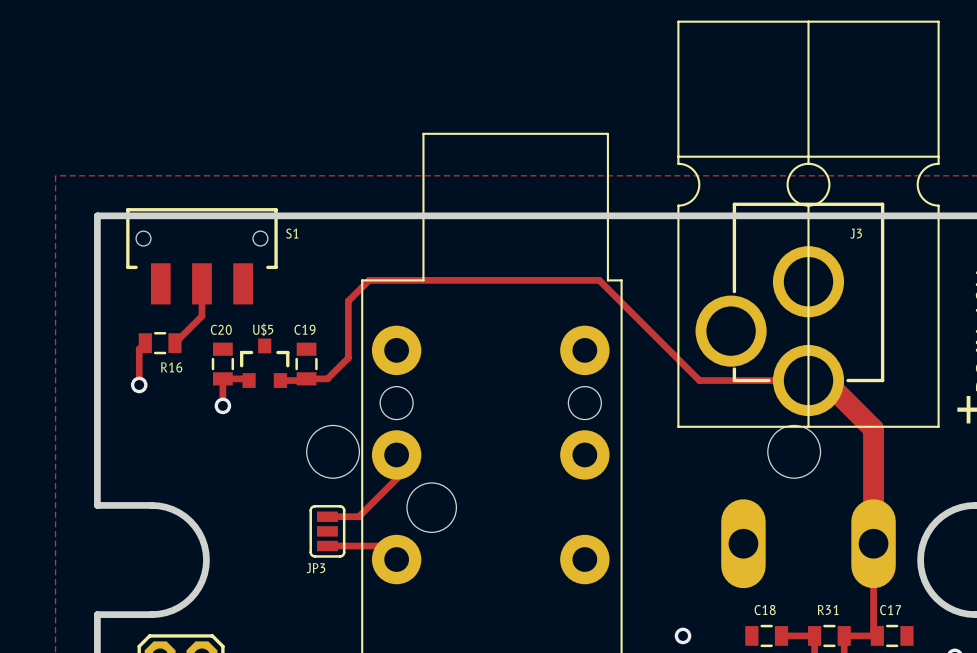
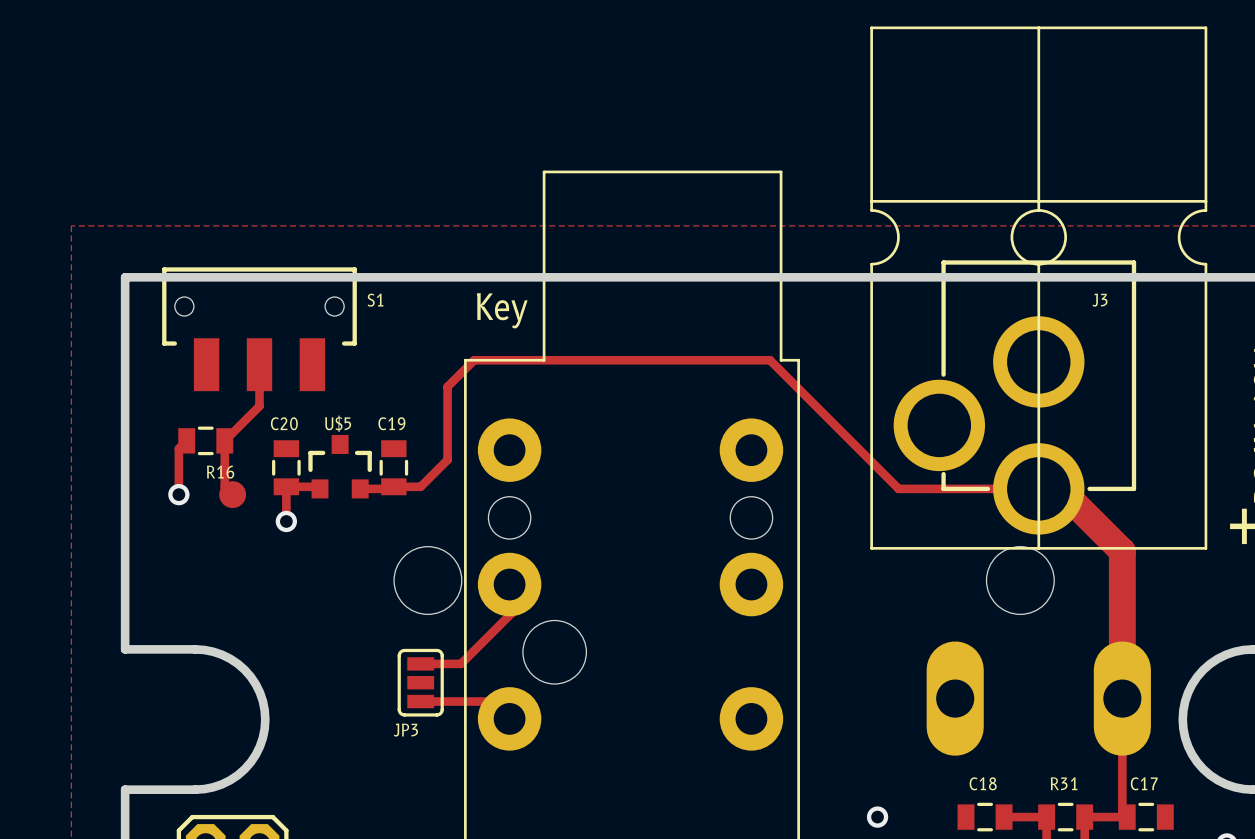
text: none -> Key (502, 310)
track: none -> (224, 440) (224, 486) (232, 494)
part: none -> (232, 494)

